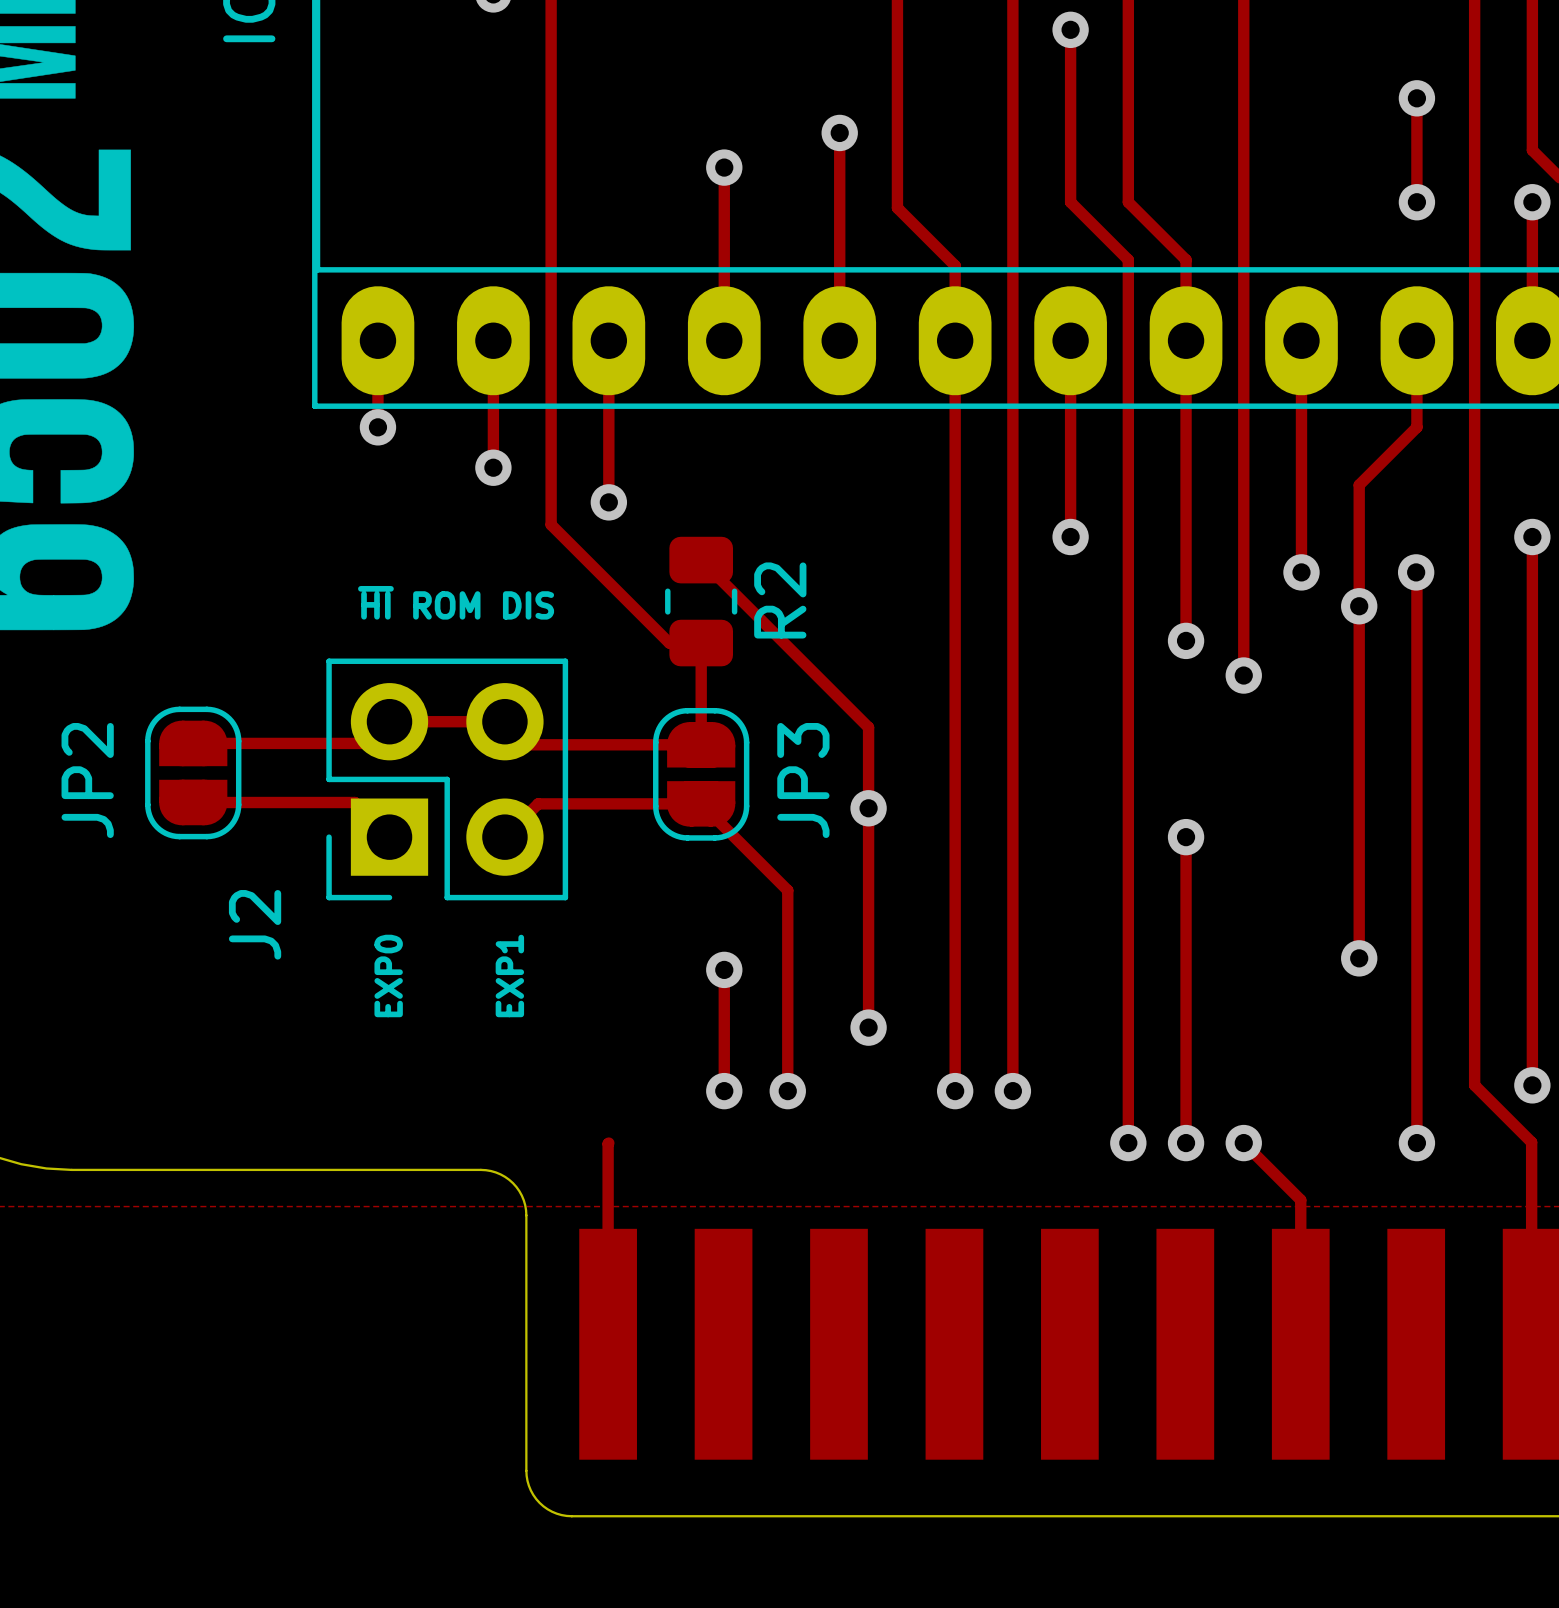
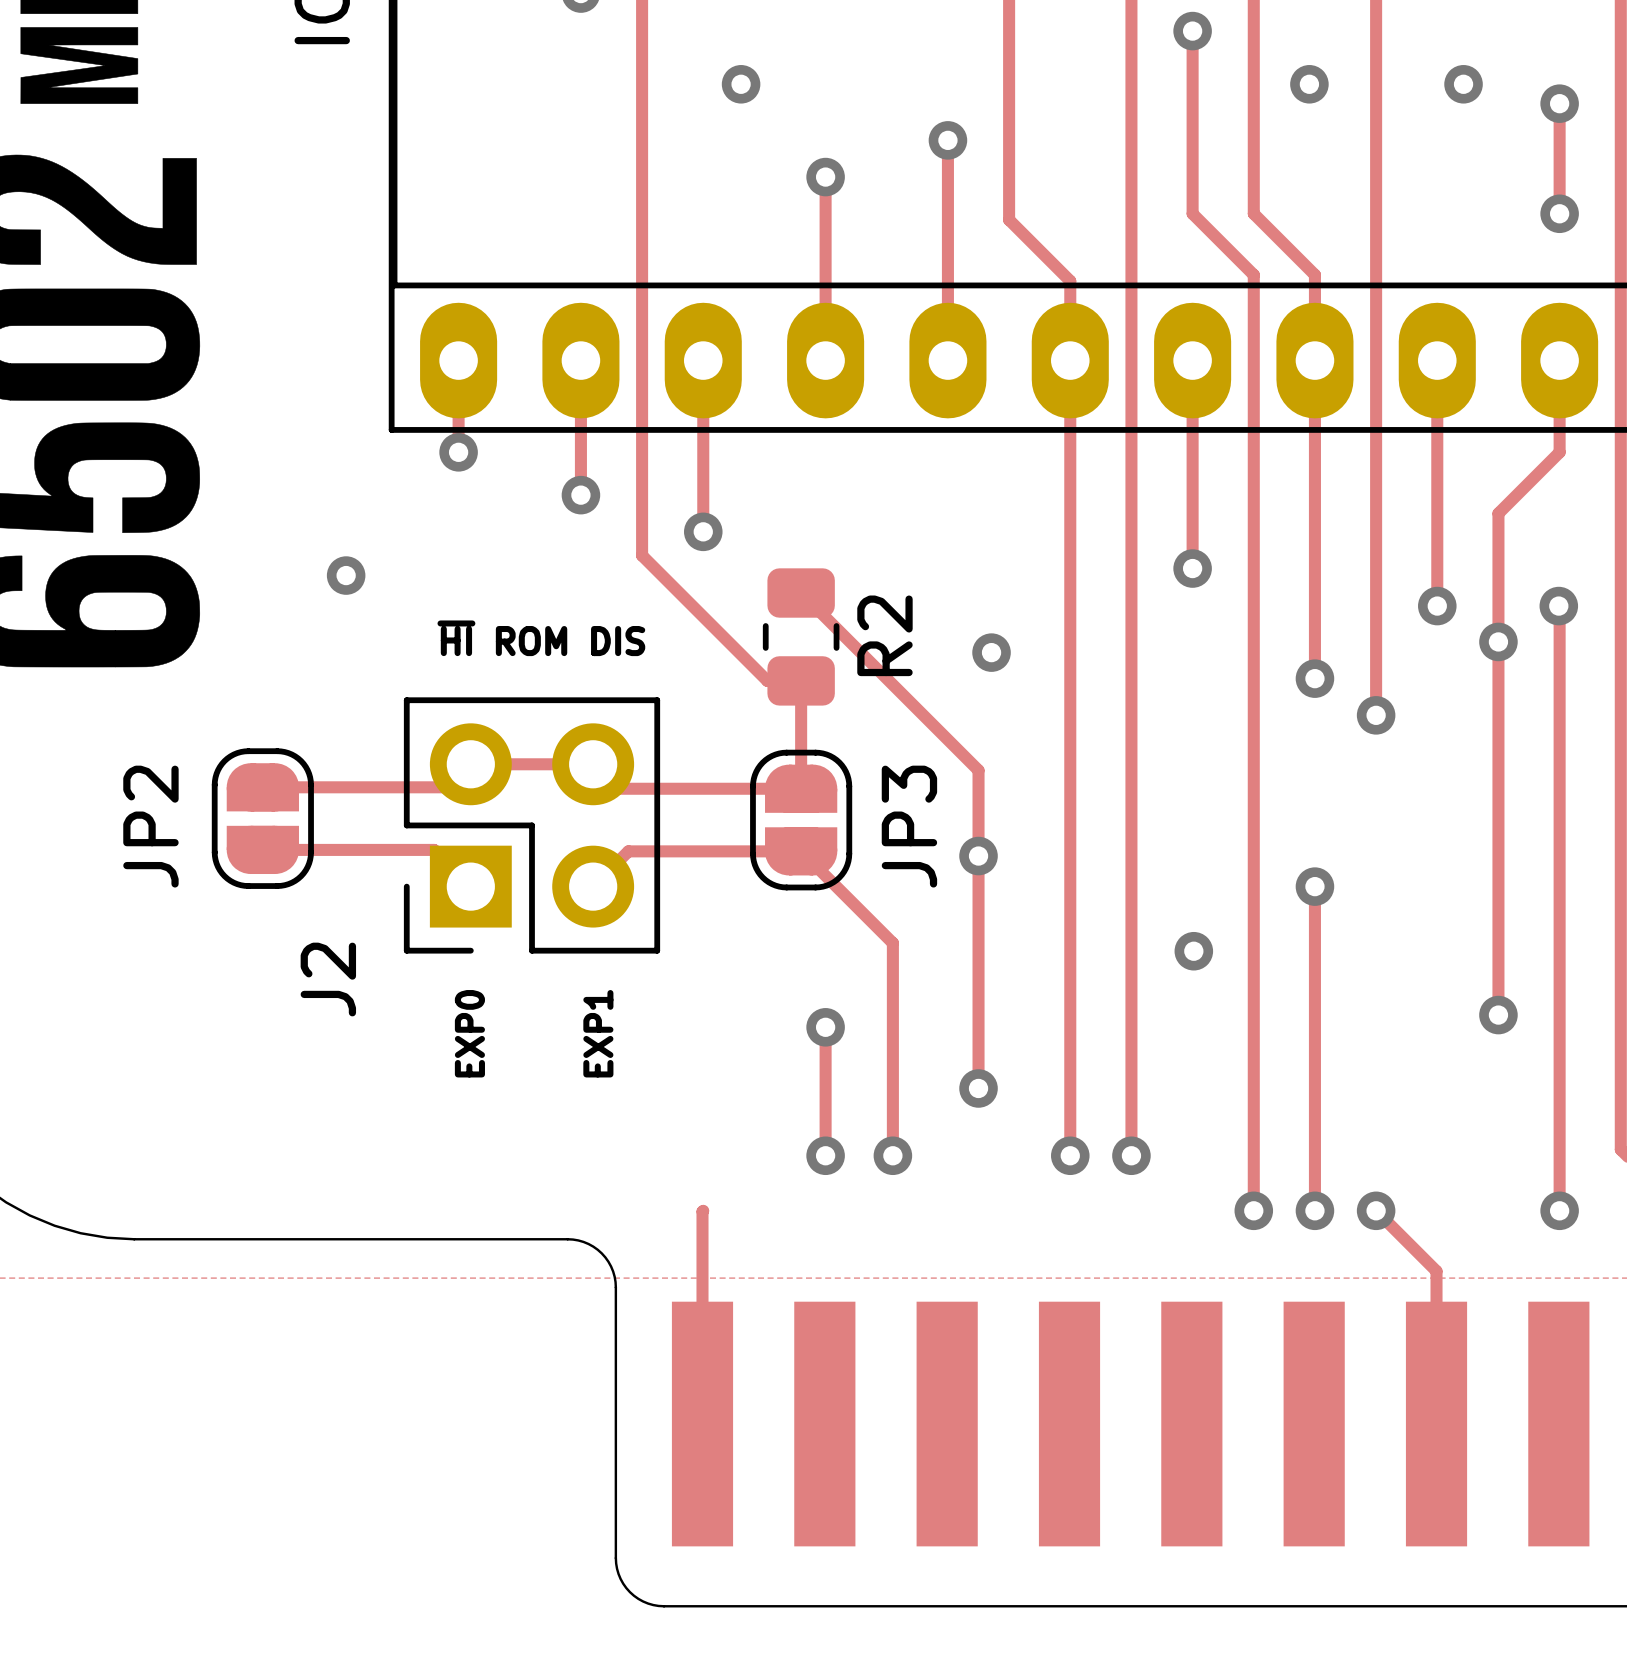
via: none -> (741, 84)
via: none -> (1309, 84)
via: none -> (1463, 84)
via: none -> (346, 575)
via: none -> (991, 652)
via: none -> (1193, 951)

